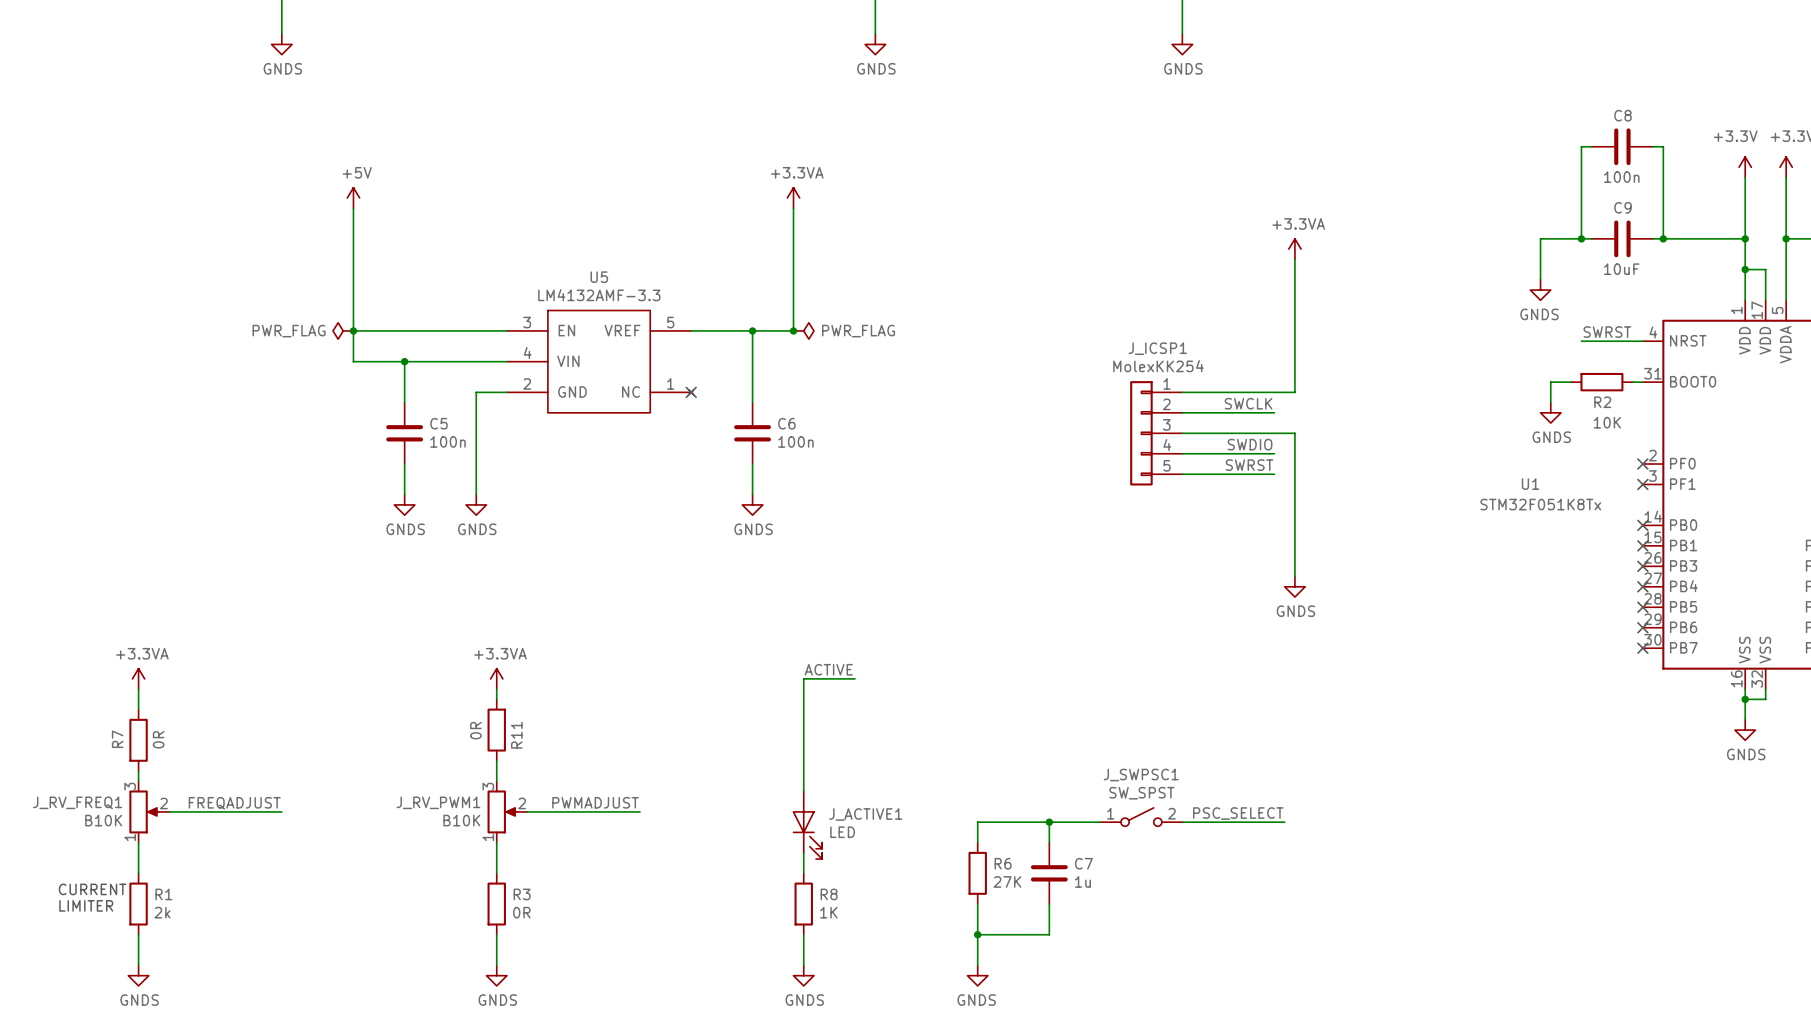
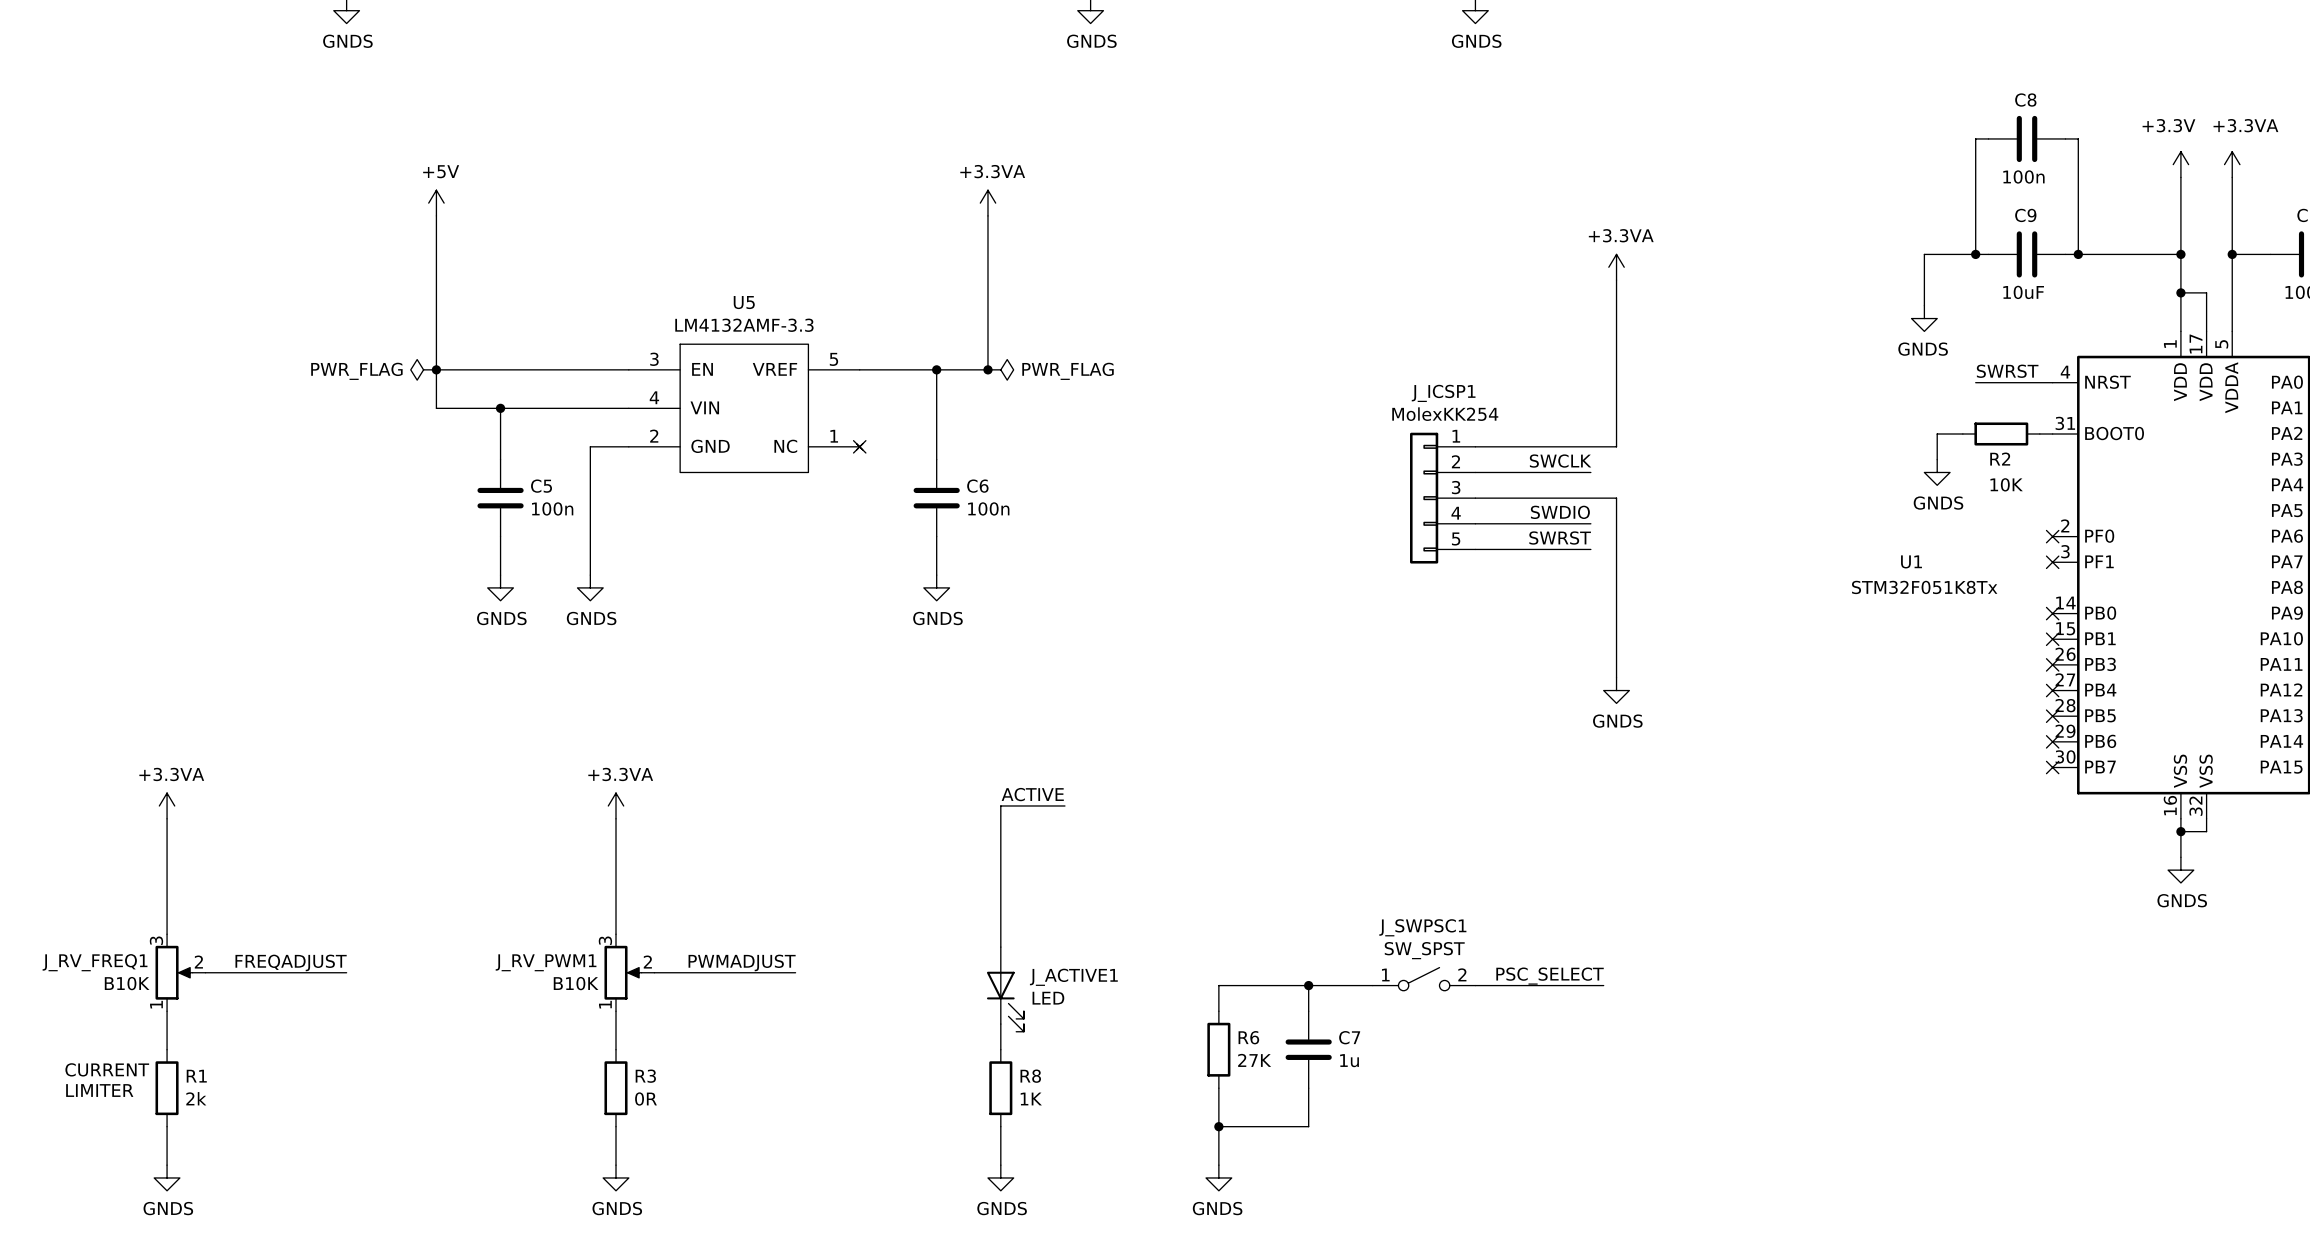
wire: none -> (616, 831) (616, 908)
wire: none -> (167, 844) (167, 921)
R11: 0R (496, 730) -> none
R7: 0R (138, 740) -> none

